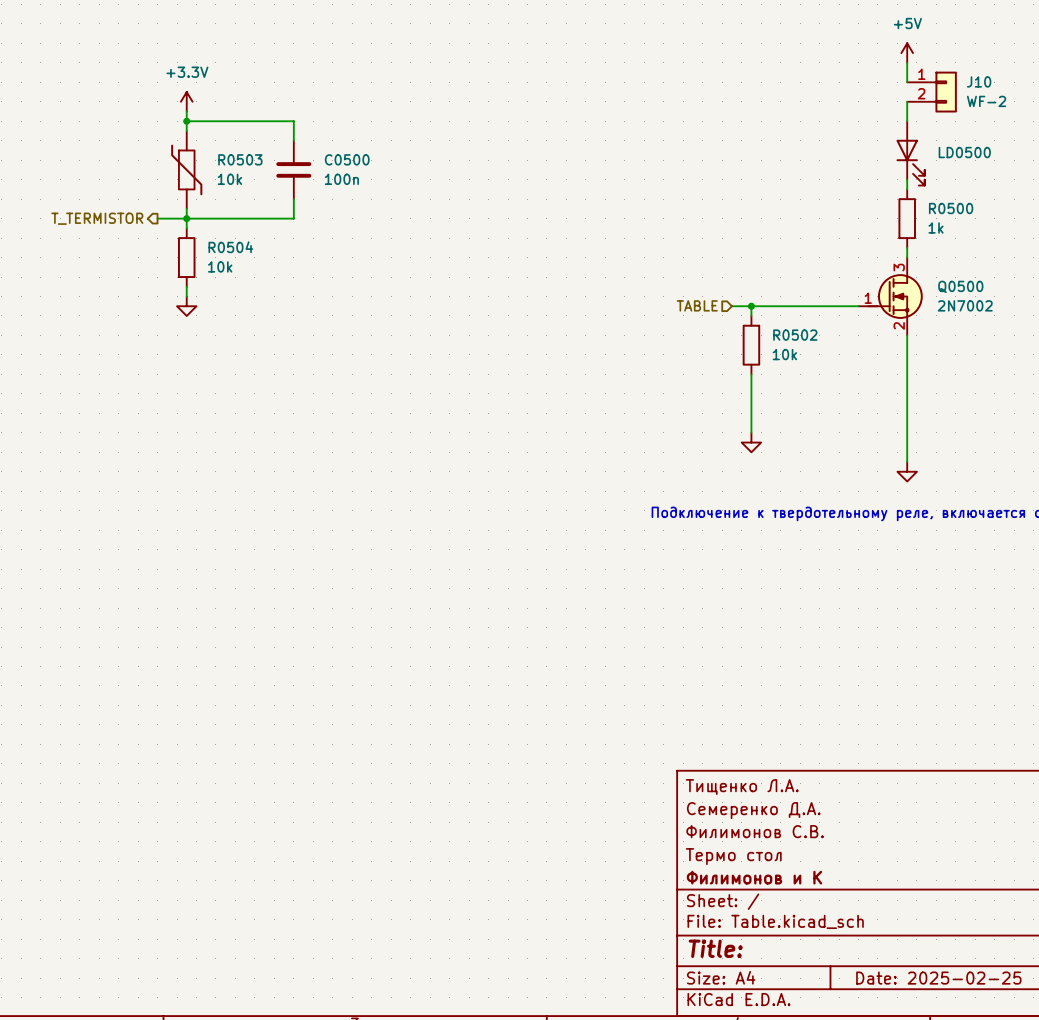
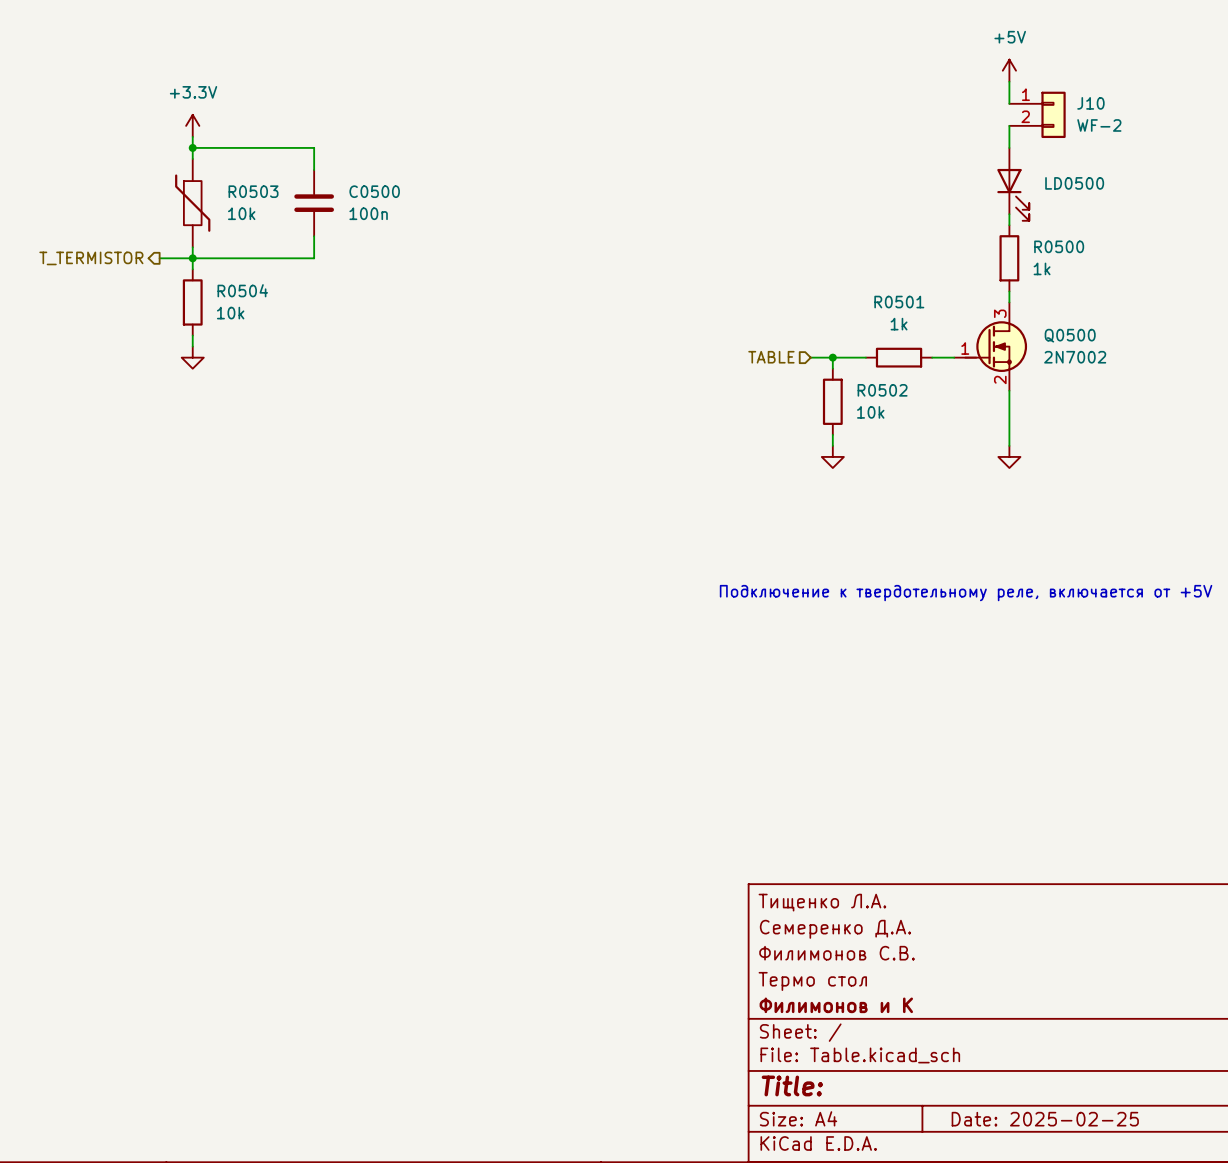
wire: (780, 306) (839, 306) -> none
R0501: none -> 1k (899, 357)
wire: (751, 384) (751, 432) -> none
wire: (907, 384) (907, 462) -> none
power symbol position: (751, 442) -> (832, 456)
power symbol position: (907, 471) -> (1009, 456)

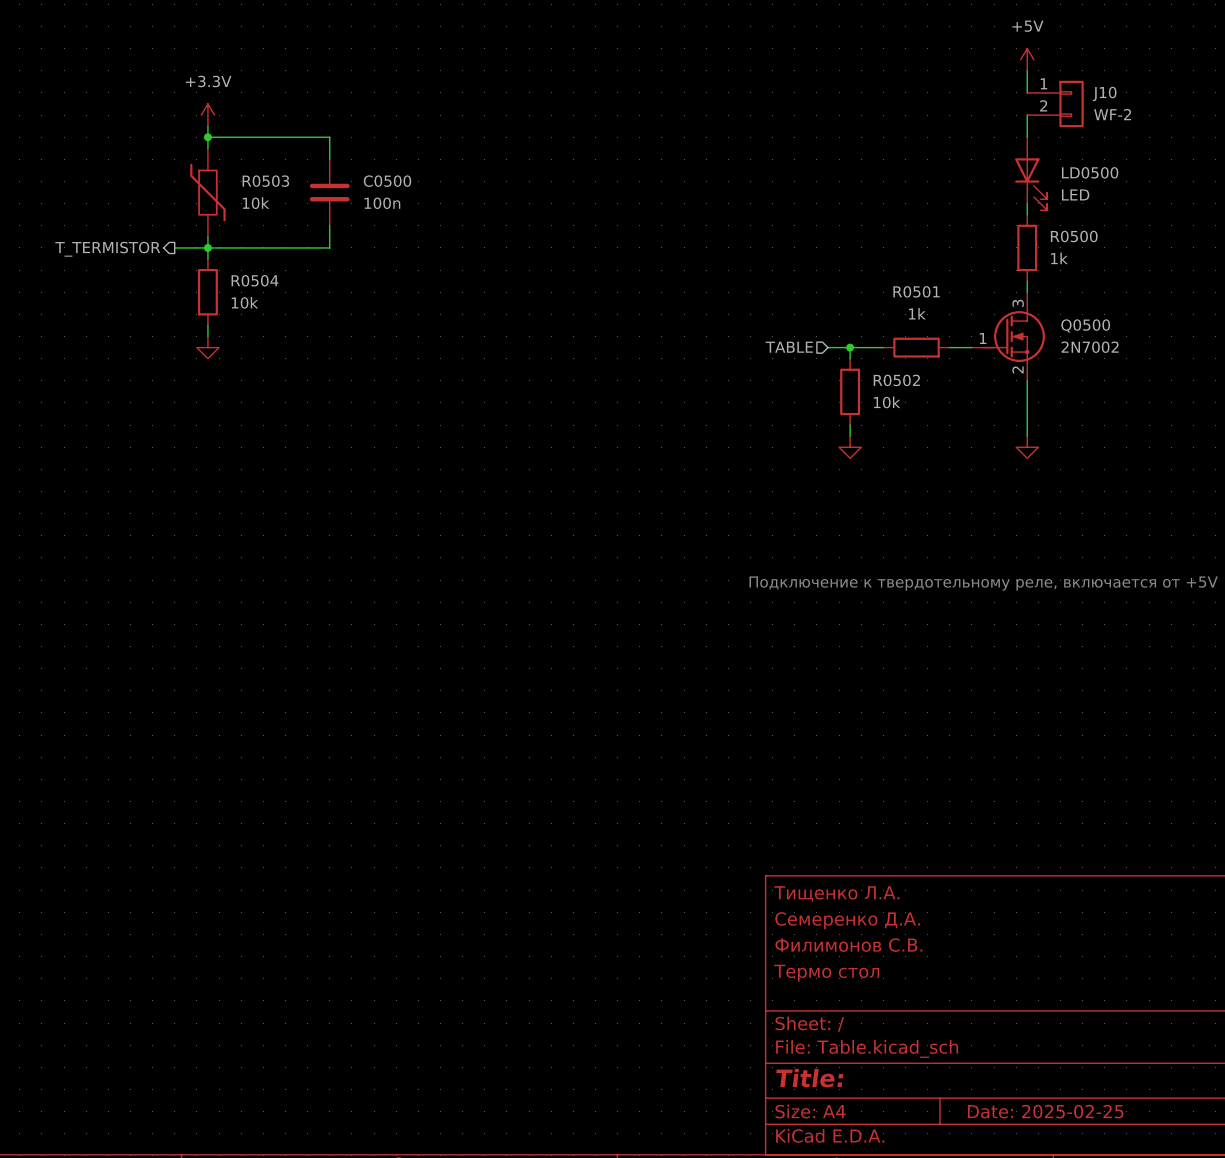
LD0500 value: none -> LED (1075, 194)
title block: Филимонов и К (836, 1005) -> none

